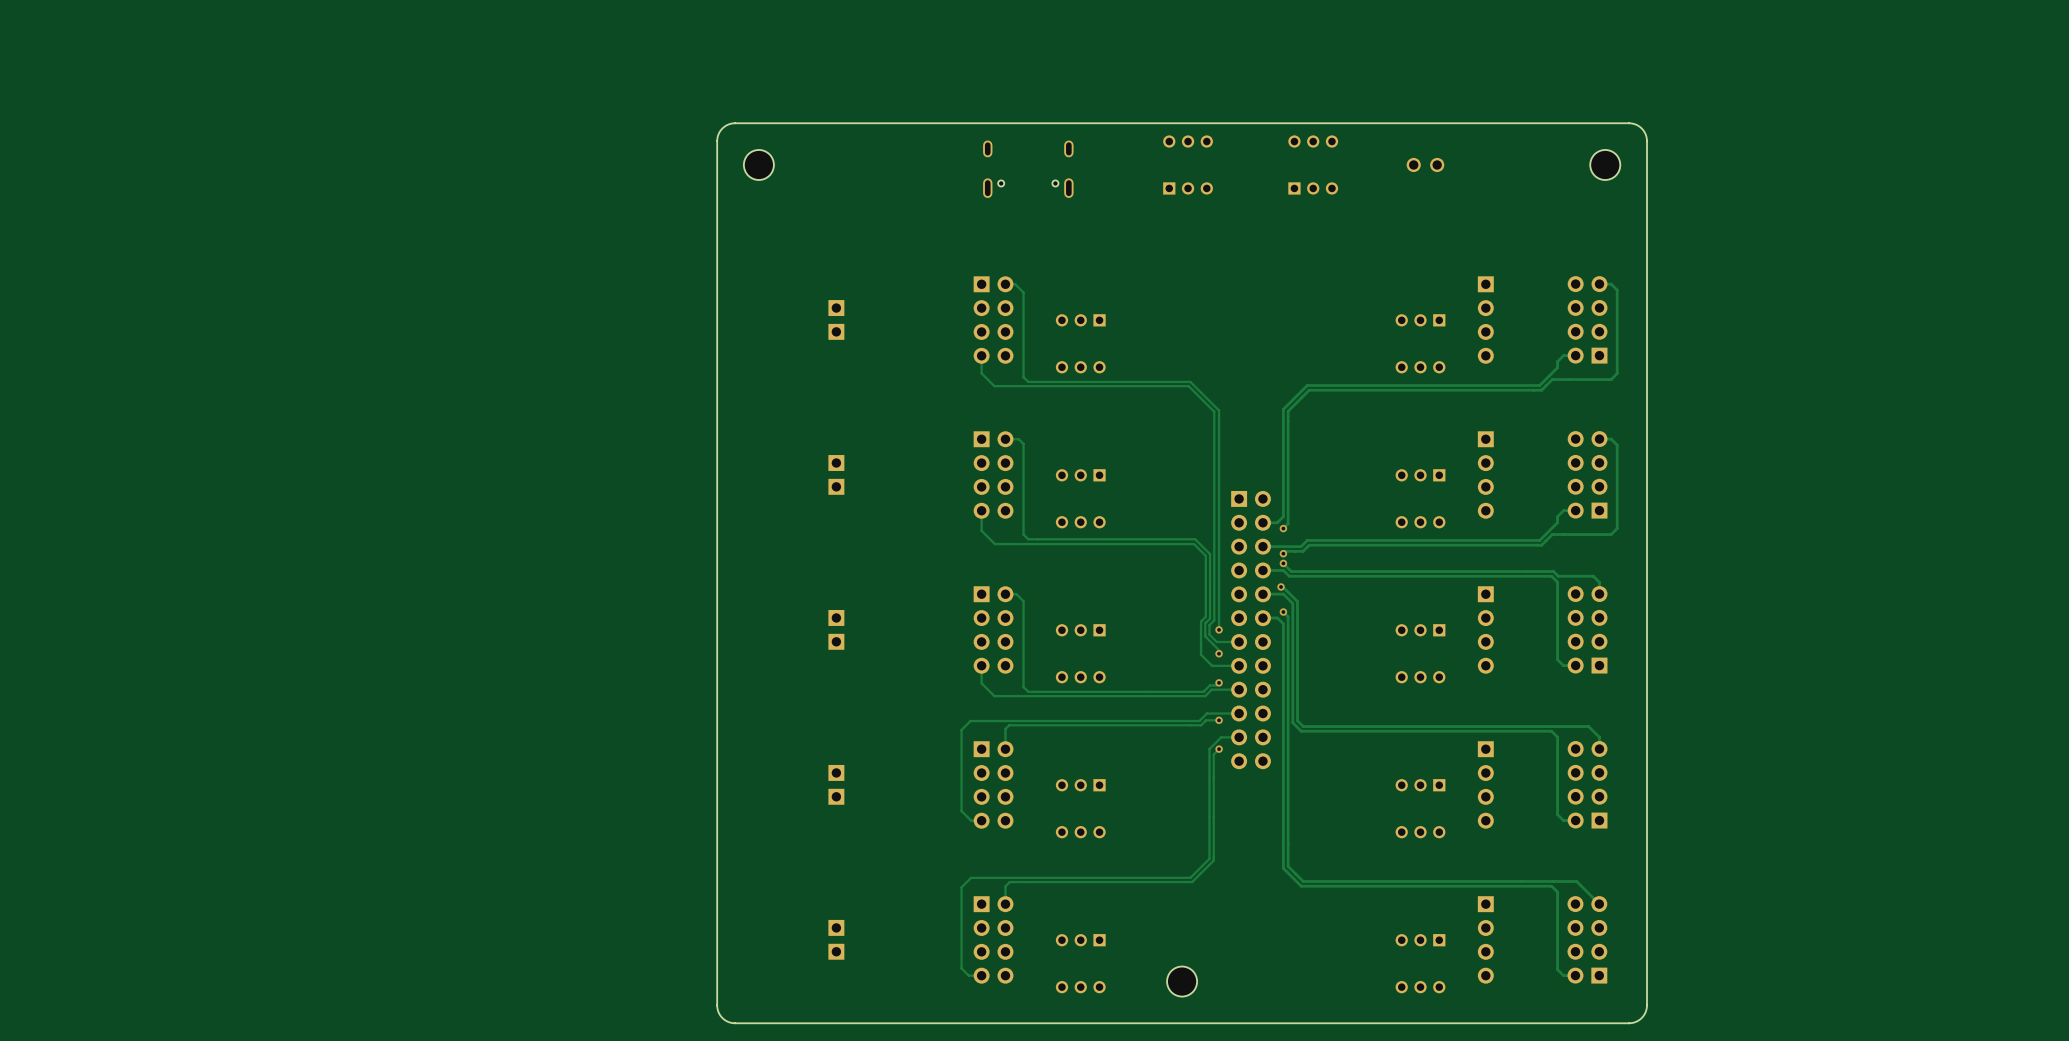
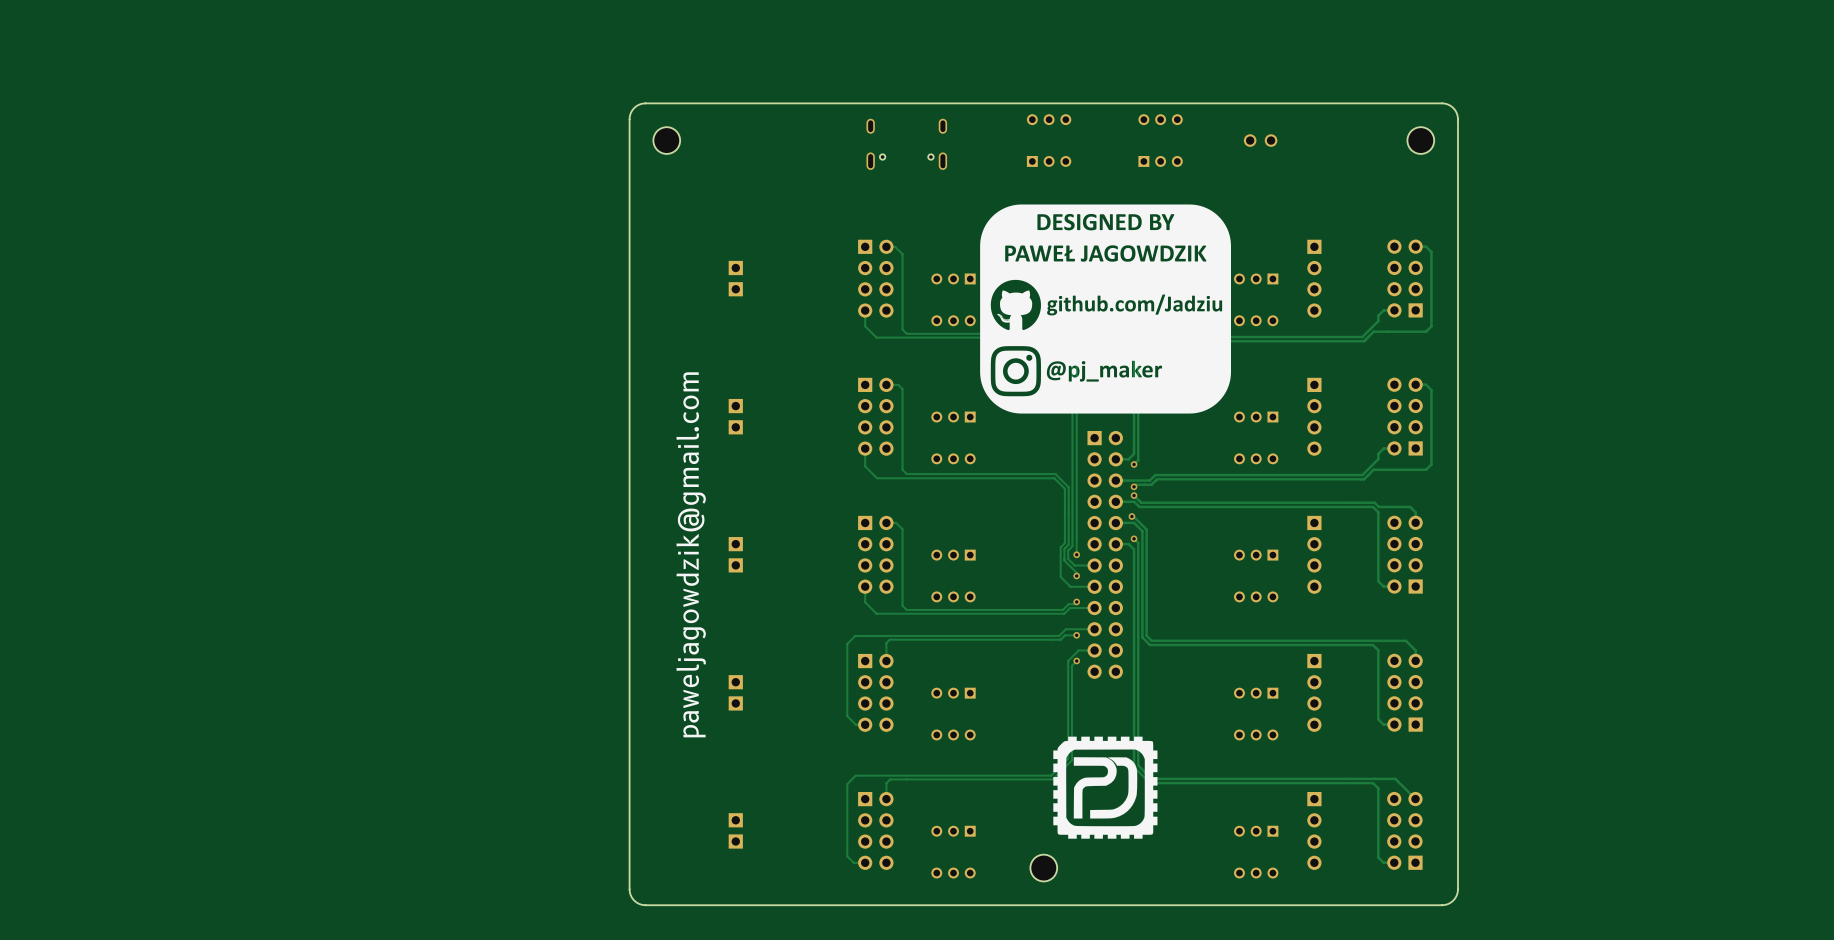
drawing: none -> [980, 204, 1231, 414]
text: none -> paweljagowdzik@gmail.com (691, 554)
drawing: none -> [1053, 736, 1158, 839]

